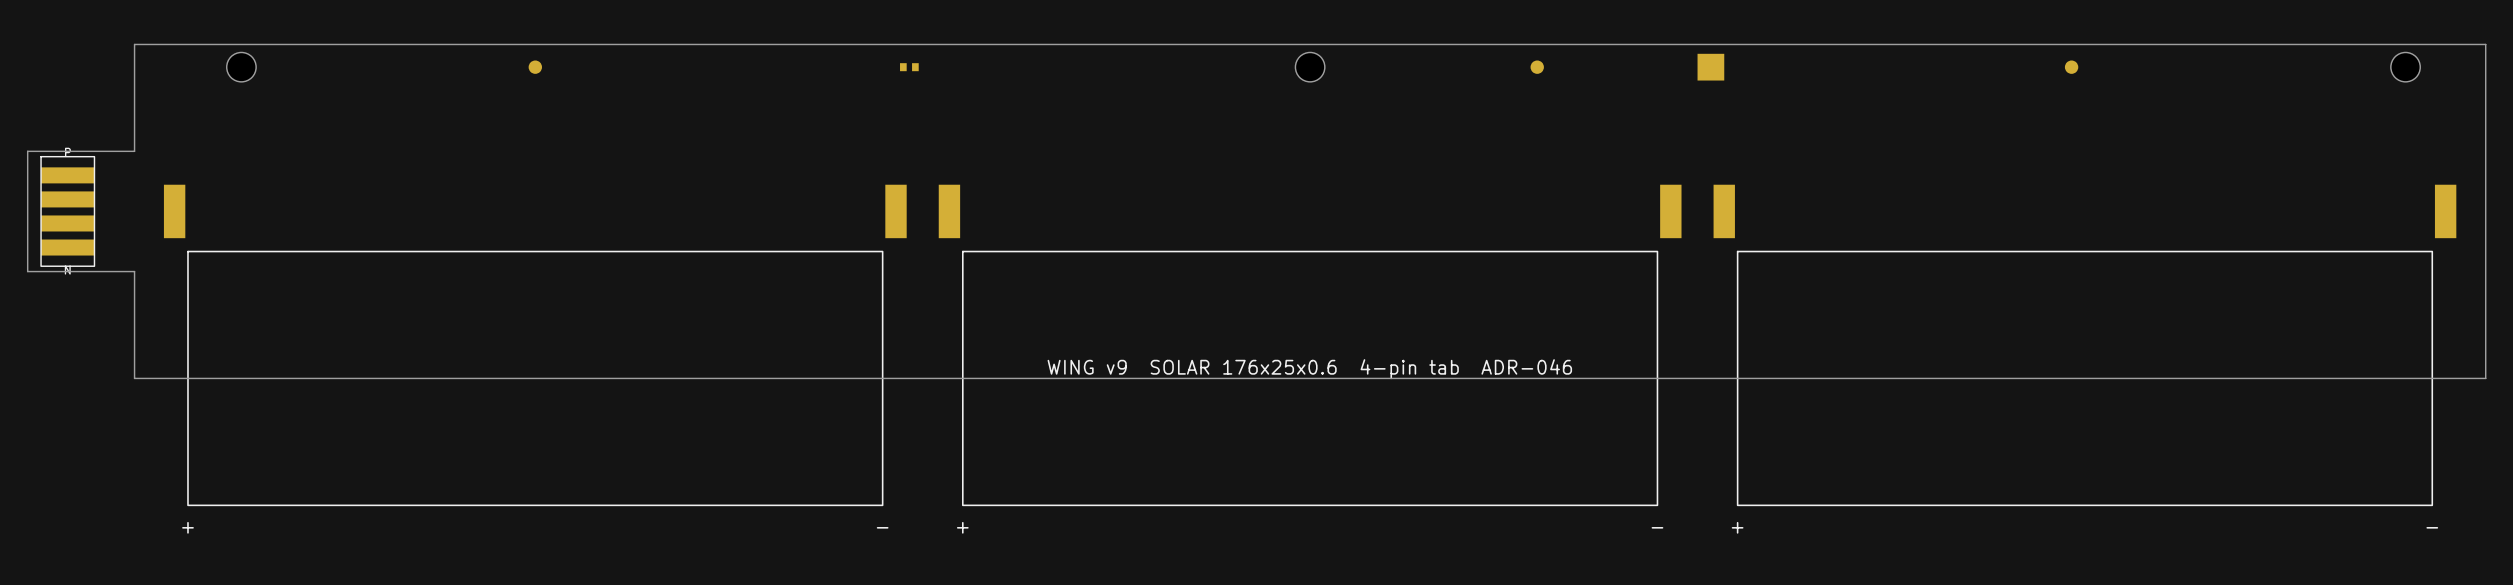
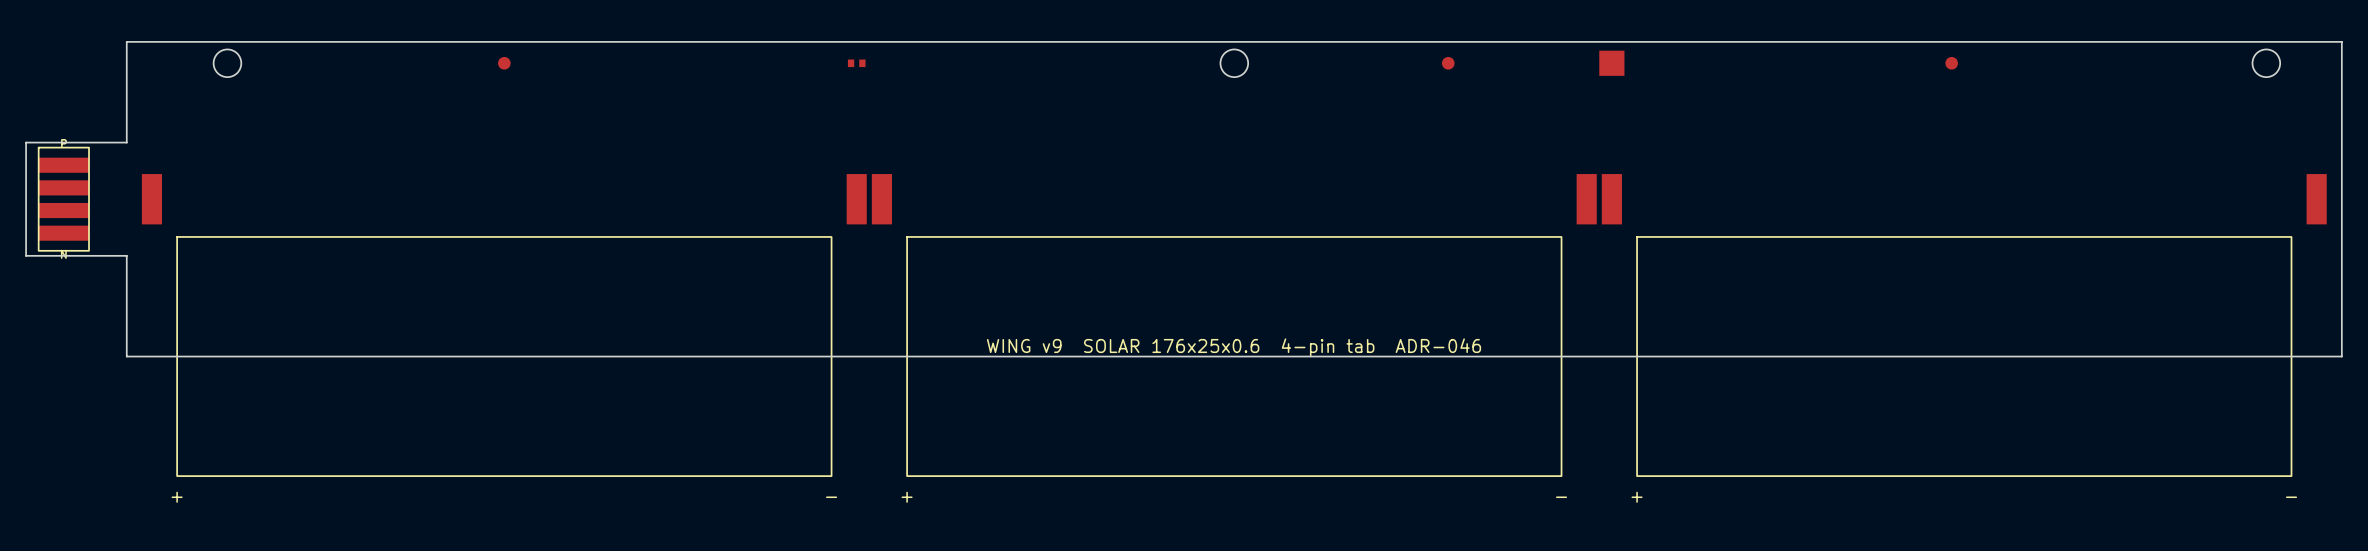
part footprint: [163, 184, 907, 507] -> [141, 174, 867, 477]
part footprint: [938, 184, 1682, 507] -> [871, 174, 1597, 477]
part footprint: [1713, 184, 2457, 507] -> [1601, 174, 2327, 477]

